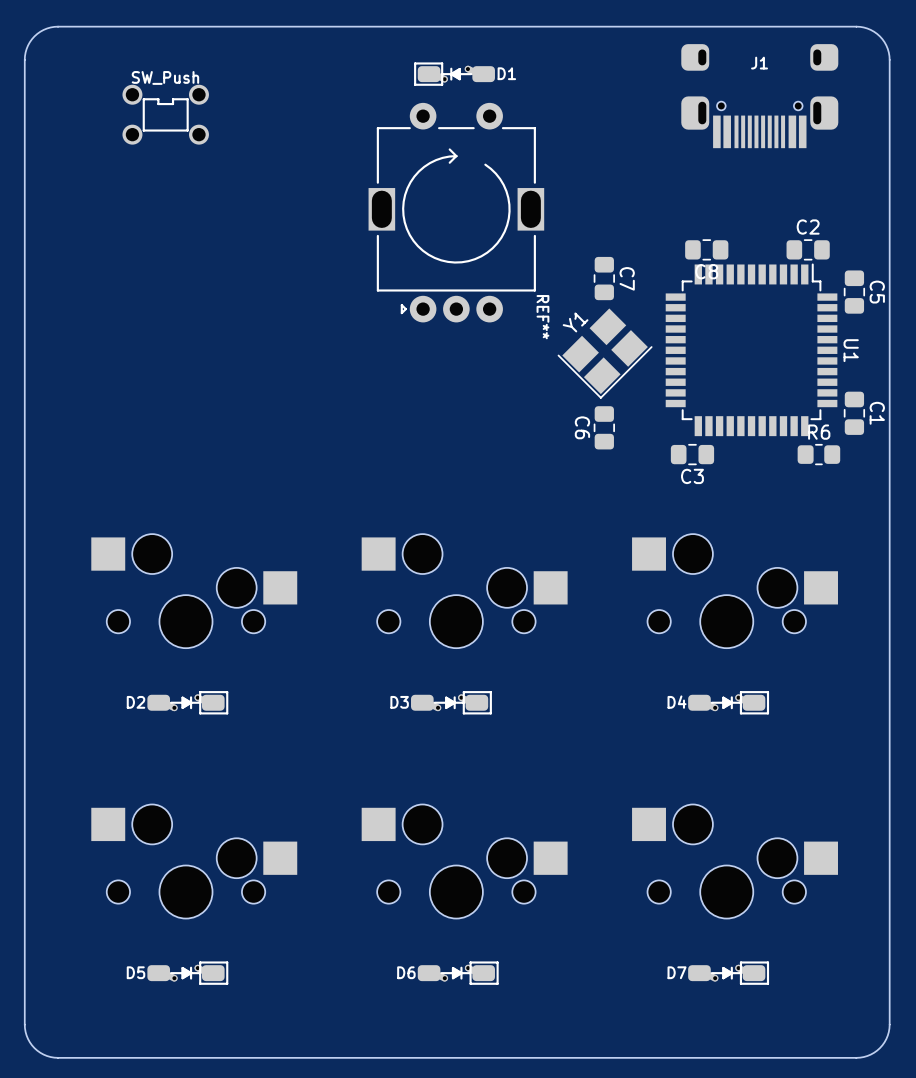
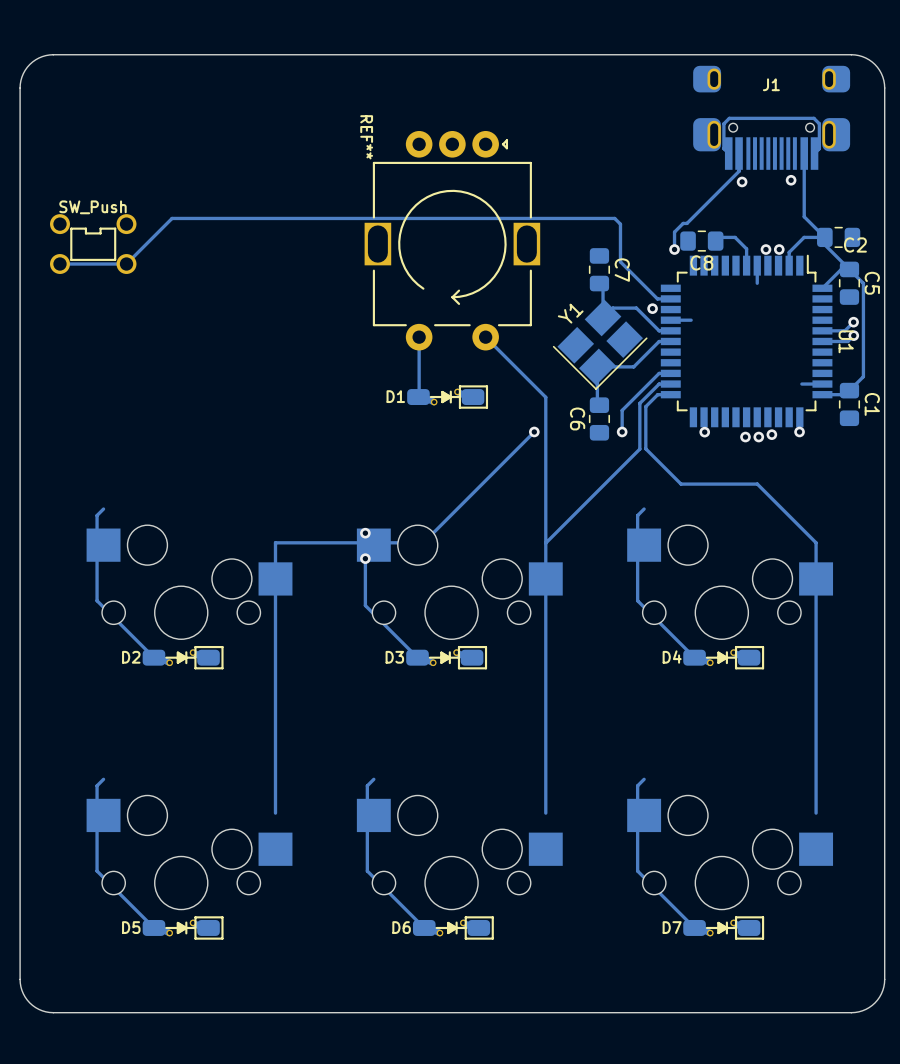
D1 rotation: 0° (454, 74) -> 180° (447, 397)
D1 position: (454, 74) -> (447, 397)
J1 position: (759, 96) -> (771, 117)
board edge: (889, 96) (889, 56) (886, 45) (874, 31) (856, 26) (54, 26) (40, 31) (28, 45) (24, 56) (24, 96) -> (884, 87) (882, 77) (874, 64) (862, 56) (851, 54) (53, 54) (42, 56) (29, 64) (23, 73) (20, 87)
part position: (165, 114) -> (93, 244)
track: none -> (739, 153) (739, 171) (686, 223) (683, 223) (674, 232) (674, 249)
track: none -> (804, 153) (804, 216) (824, 237)
track: none -> (814, 153) (819, 148) (819, 123) (813, 118) (729, 118) (723, 123) (723, 148) (728, 153)
via: none -> (791, 180)
via: none -> (742, 181)
part rotation: 0° (456, 212) -> 180° (452, 240)
C2 name position: C2 (808, 227) -> C2 (855, 245)
track: none -> (718, 237) (735, 237) (746, 248) (746, 265)
track: none -> (824, 237) (804, 237) (789, 252) (789, 265)
track: none -> (824, 237) (824, 244) (863, 283) (863, 376) (845, 394) (822, 394)
C2 position: (808, 249) -> (838, 237)
via: none -> (674, 249)
via: none -> (765, 249)
via: none -> (779, 249)
track: none -> (59, 264) (126, 264) (172, 218) (614, 218) (620, 224) (620, 261) (657, 298) (670, 298)
track: none -> (757, 265) (757, 283)
track: none -> (849, 269) (841, 269) (822, 288)
track: none -> (599, 283) (603, 287) (603, 317) (612, 308) (636, 308) (659, 330) (670, 330)
via: none -> (652, 308)
track: none -> (691, 320) (670, 320)
track: none -> (853, 322) (844, 330) (822, 330)
via: none -> (853, 322)
track: none -> (853, 335) (847, 341) (822, 341)
via: none -> (853, 335)
track: none -> (419, 337) (418, 397)
track: none -> (485, 337) (545, 397) (545, 813)
track: none -> (670, 341) (659, 341) (633, 366) (597, 366) (597, 403) (599, 405)
track: none -> (670, 373) (659, 373) (622, 410) (622, 431)
track: none -> (670, 384) (659, 384) (639, 403) (639, 449) (545, 542)
track: none -> (822, 384) (801, 384)
track: none -> (670, 394) (657, 394) (645, 406) (645, 448) (681, 484) (757, 484) (816, 542) (816, 813)
track: none -> (534, 431) (423, 542) (275, 542) (275, 813)
via: none -> (534, 431)
via: none -> (622, 431)
via: none -> (799, 431)
via: none -> (704, 432)
via: none -> (771, 434)
via: none -> (745, 437)
via: none -> (758, 437)
C3: (692, 454) -> none
R6: (818, 454) -> none
track: none -> (103, 509) (97, 515) (97, 600) (153, 657)
track: none -> (644, 509) (637, 515) (637, 600) (694, 657)
via: none -> (365, 533)
track: none -> (365, 558) (365, 605) (417, 657)
via: none -> (365, 558)
D2 position: (187, 702) -> (183, 657)
D3 position: (451, 702) -> (446, 657)
D4 position: (728, 702) -> (723, 657)
track: none -> (103, 779) (97, 785) (97, 871) (153, 927)
track: none -> (373, 779) (367, 785) (367, 871) (424, 927)
track: none -> (644, 779) (637, 785) (637, 871) (694, 927)
D5 position: (187, 973) -> (183, 927)
D6 position: (458, 973) -> (453, 927)
D7 position: (728, 973) -> (723, 927)
board edge: (889, 988) (889, 1028) (886, 1039) (874, 1052) (856, 1057) (54, 1057) (37, 1050) (28, 1039) (24, 1028) (24, 988) -> (884, 979) (881, 993) (874, 1002) (865, 1009) (851, 1012) (53, 1012) (38, 1009) (29, 1002) (21, 990) (20, 979)

